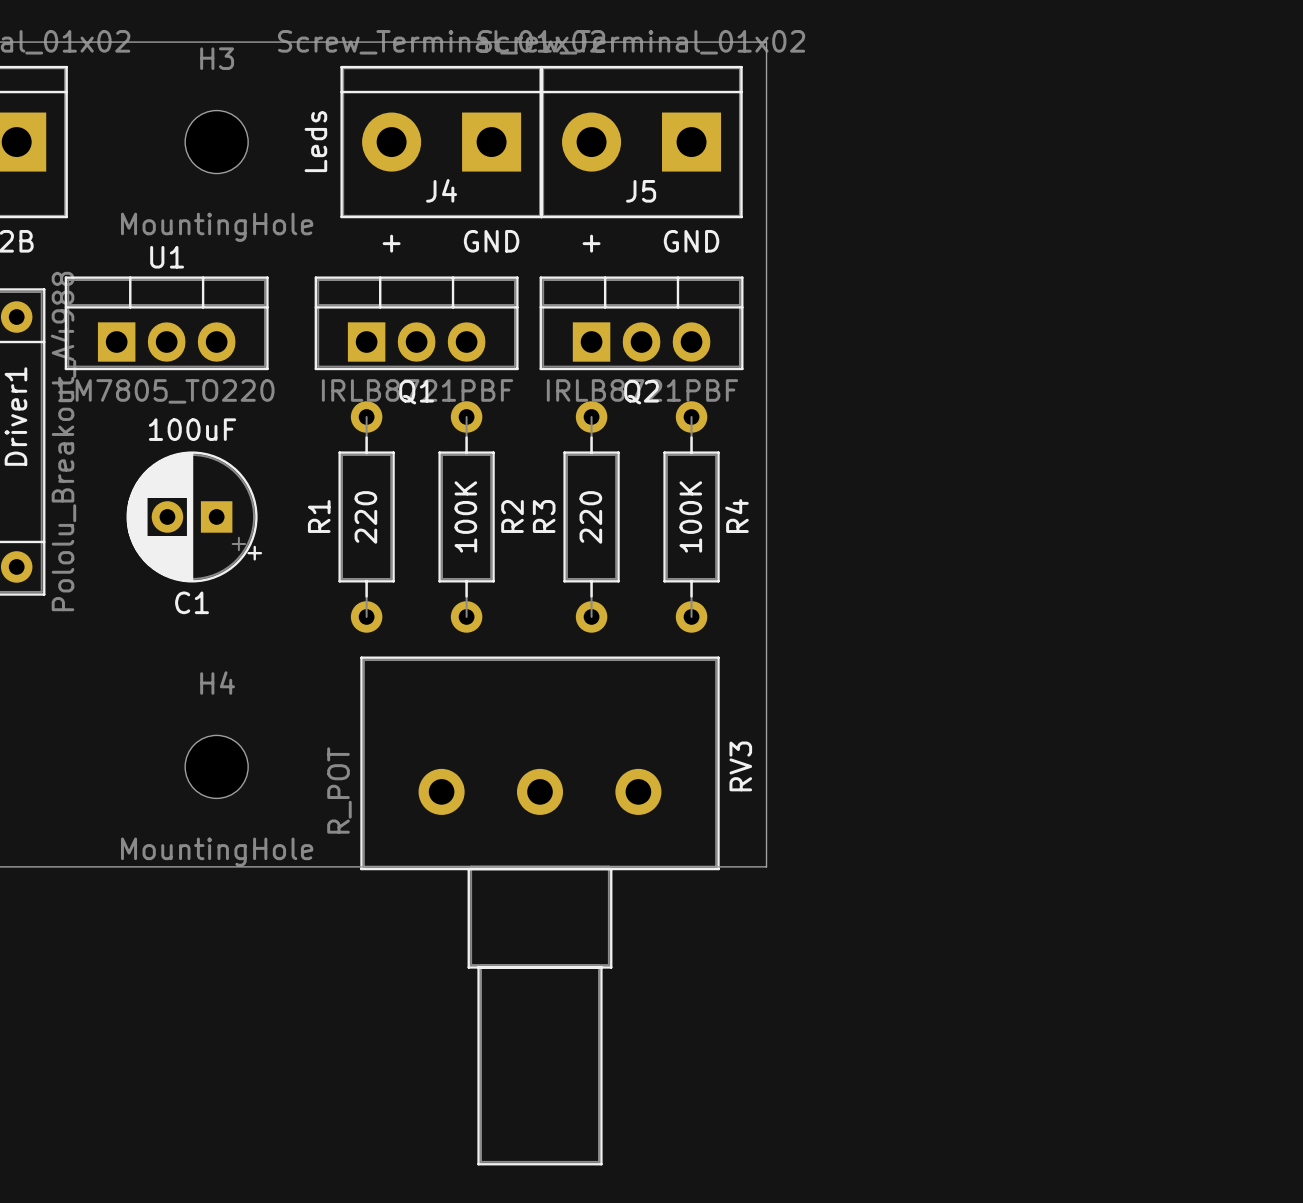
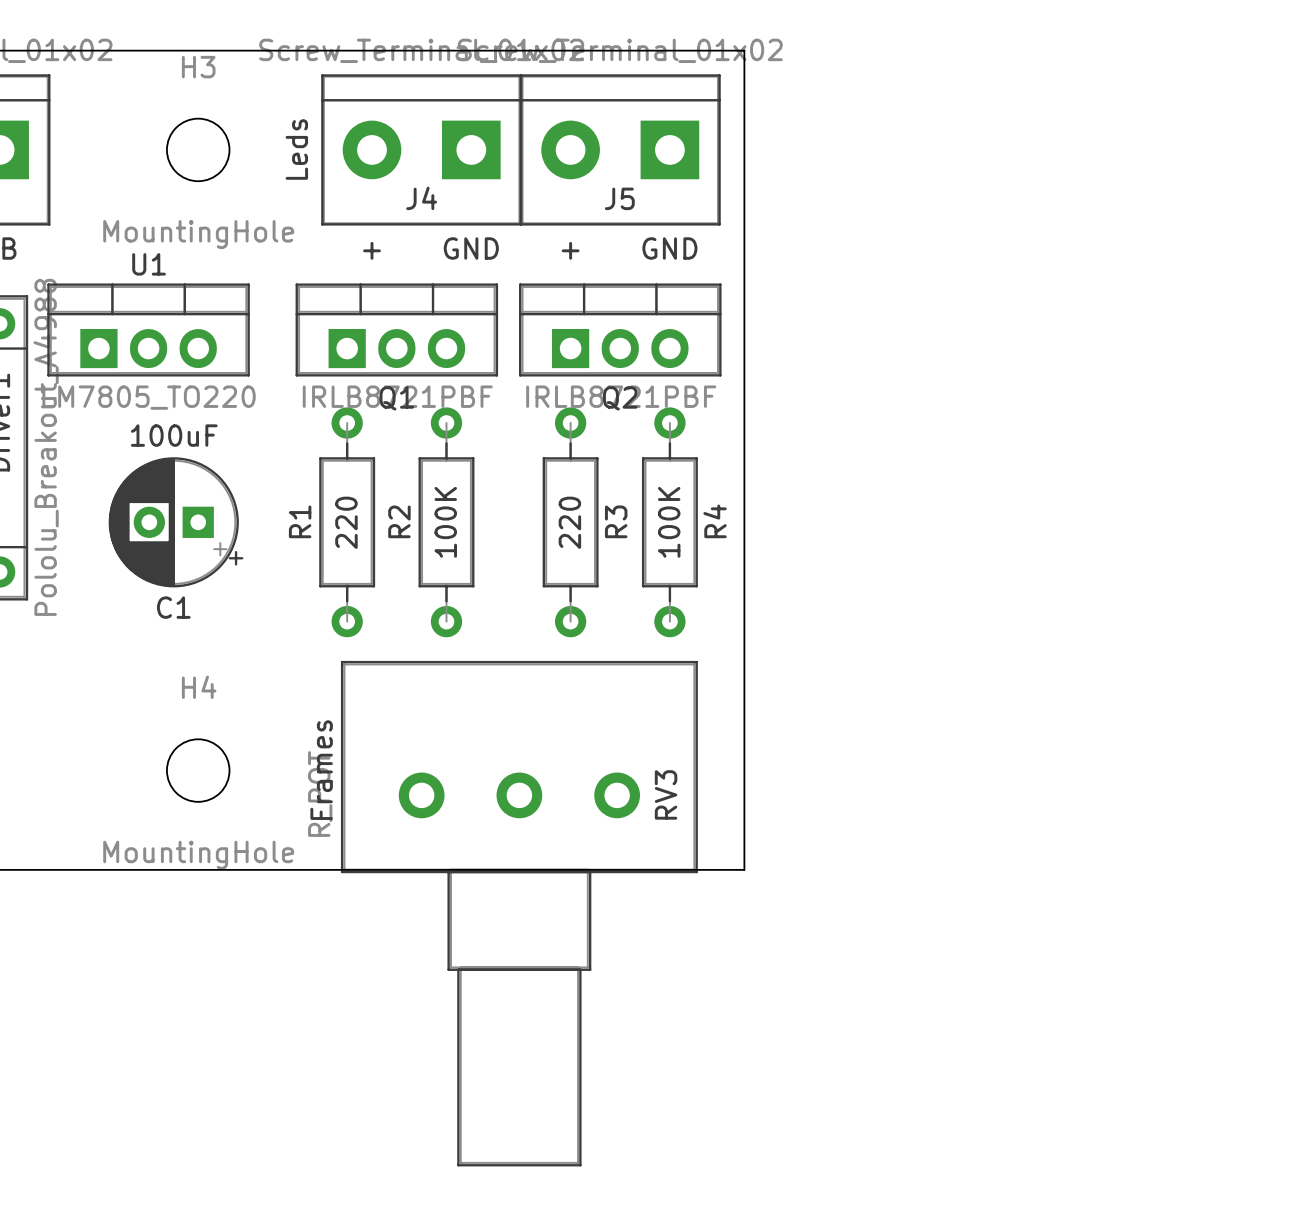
R2 name position: R2 (512, 516) -> R2 (399, 521)
R3 name position: R3 (544, 516) -> R3 (616, 521)
text: none -> Frames (321, 770)
RV3 name position: RV3 (740, 766) -> RV3 (666, 794)

